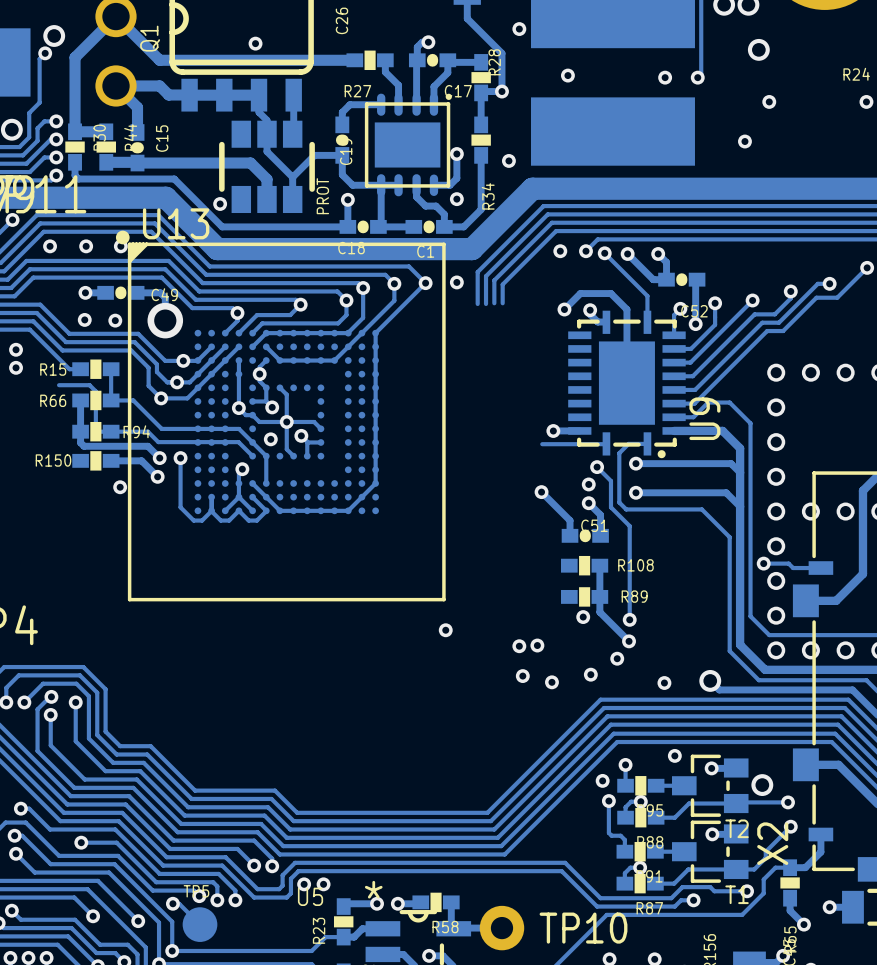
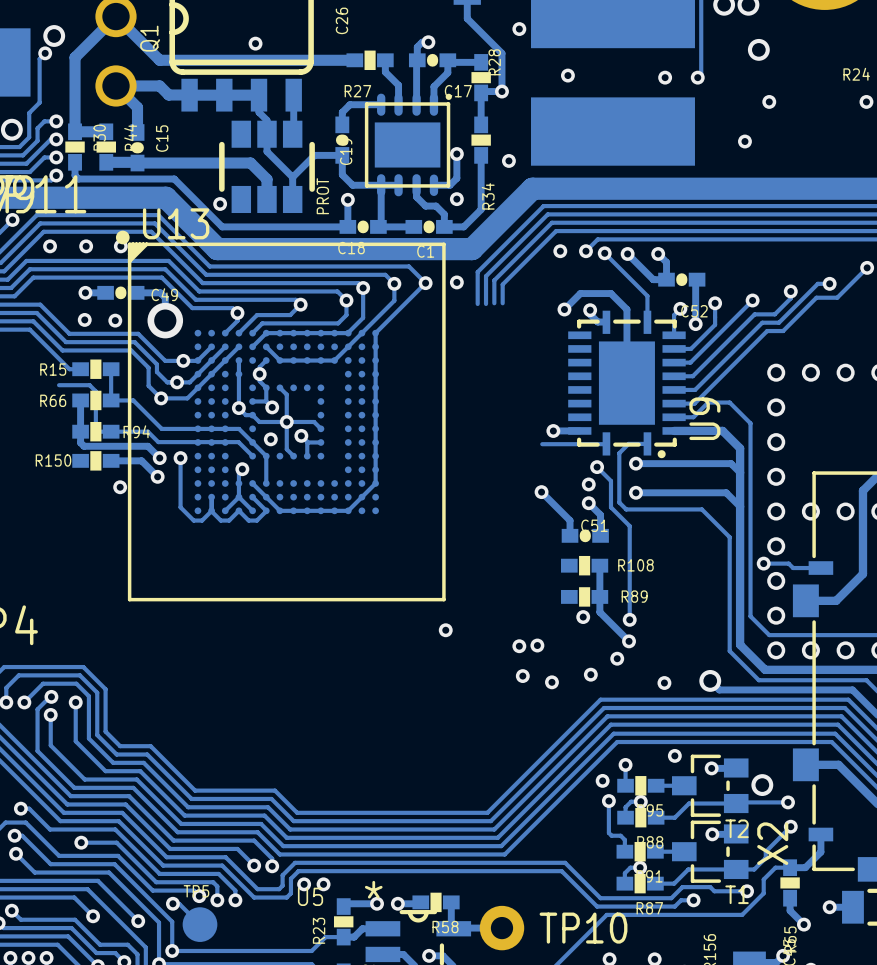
via: (16, 349) -> none
via: (16, 367) -> none

